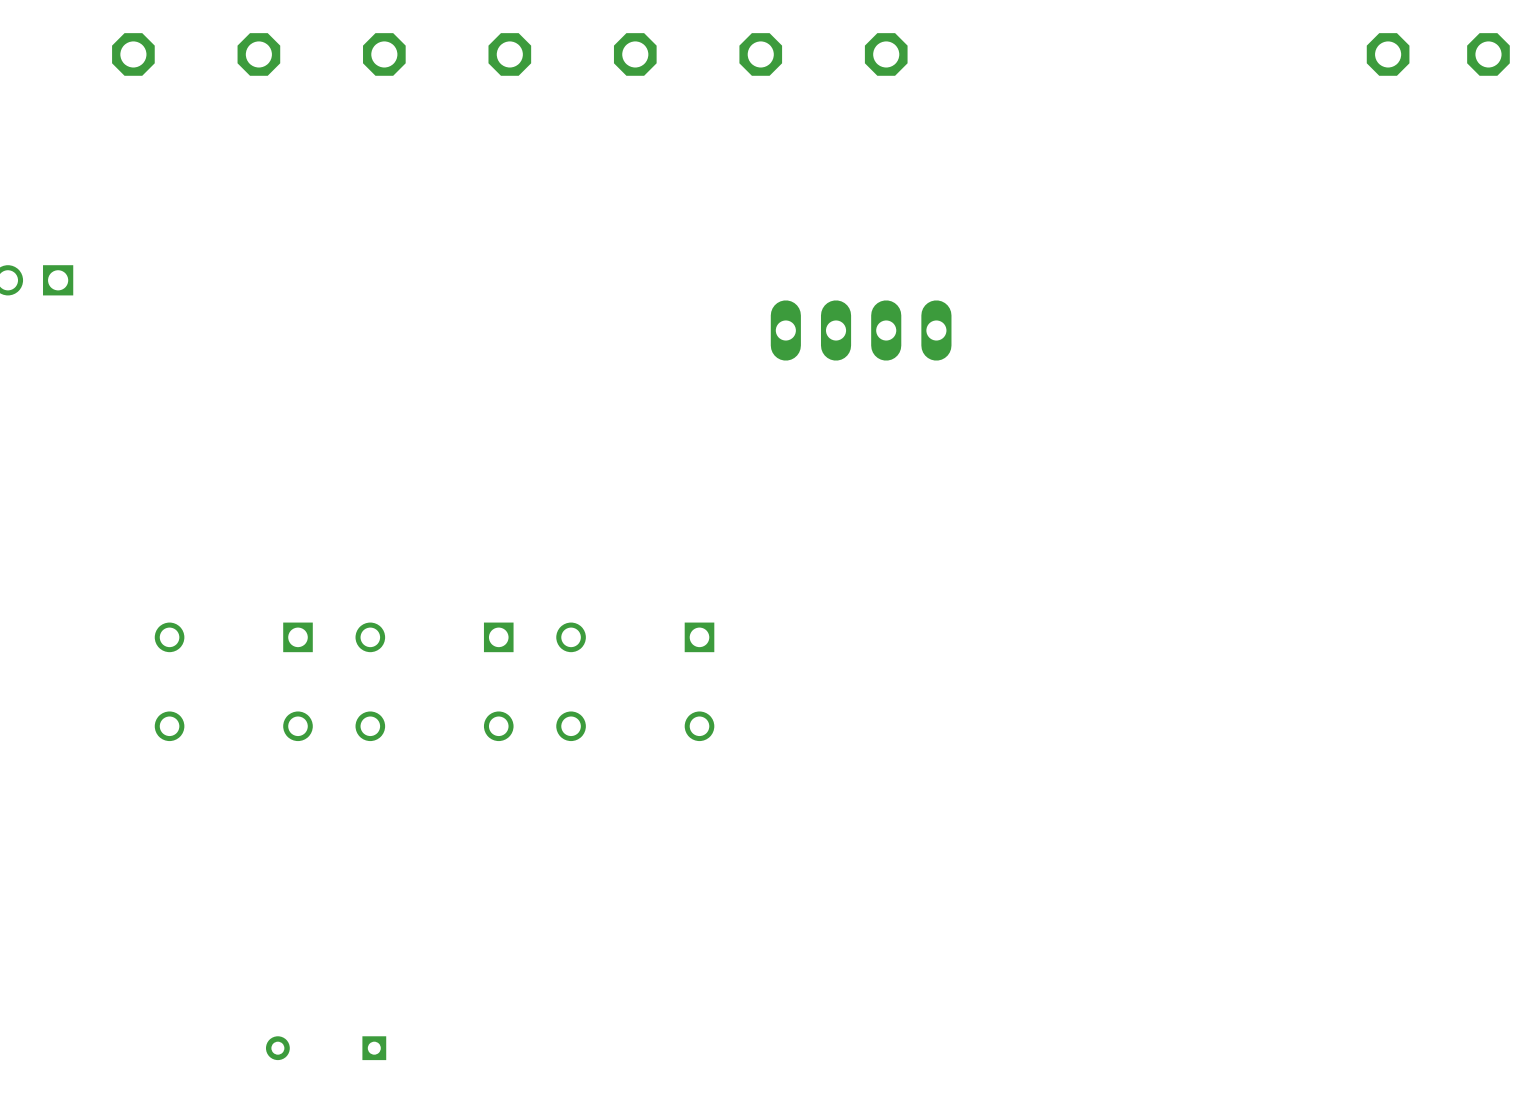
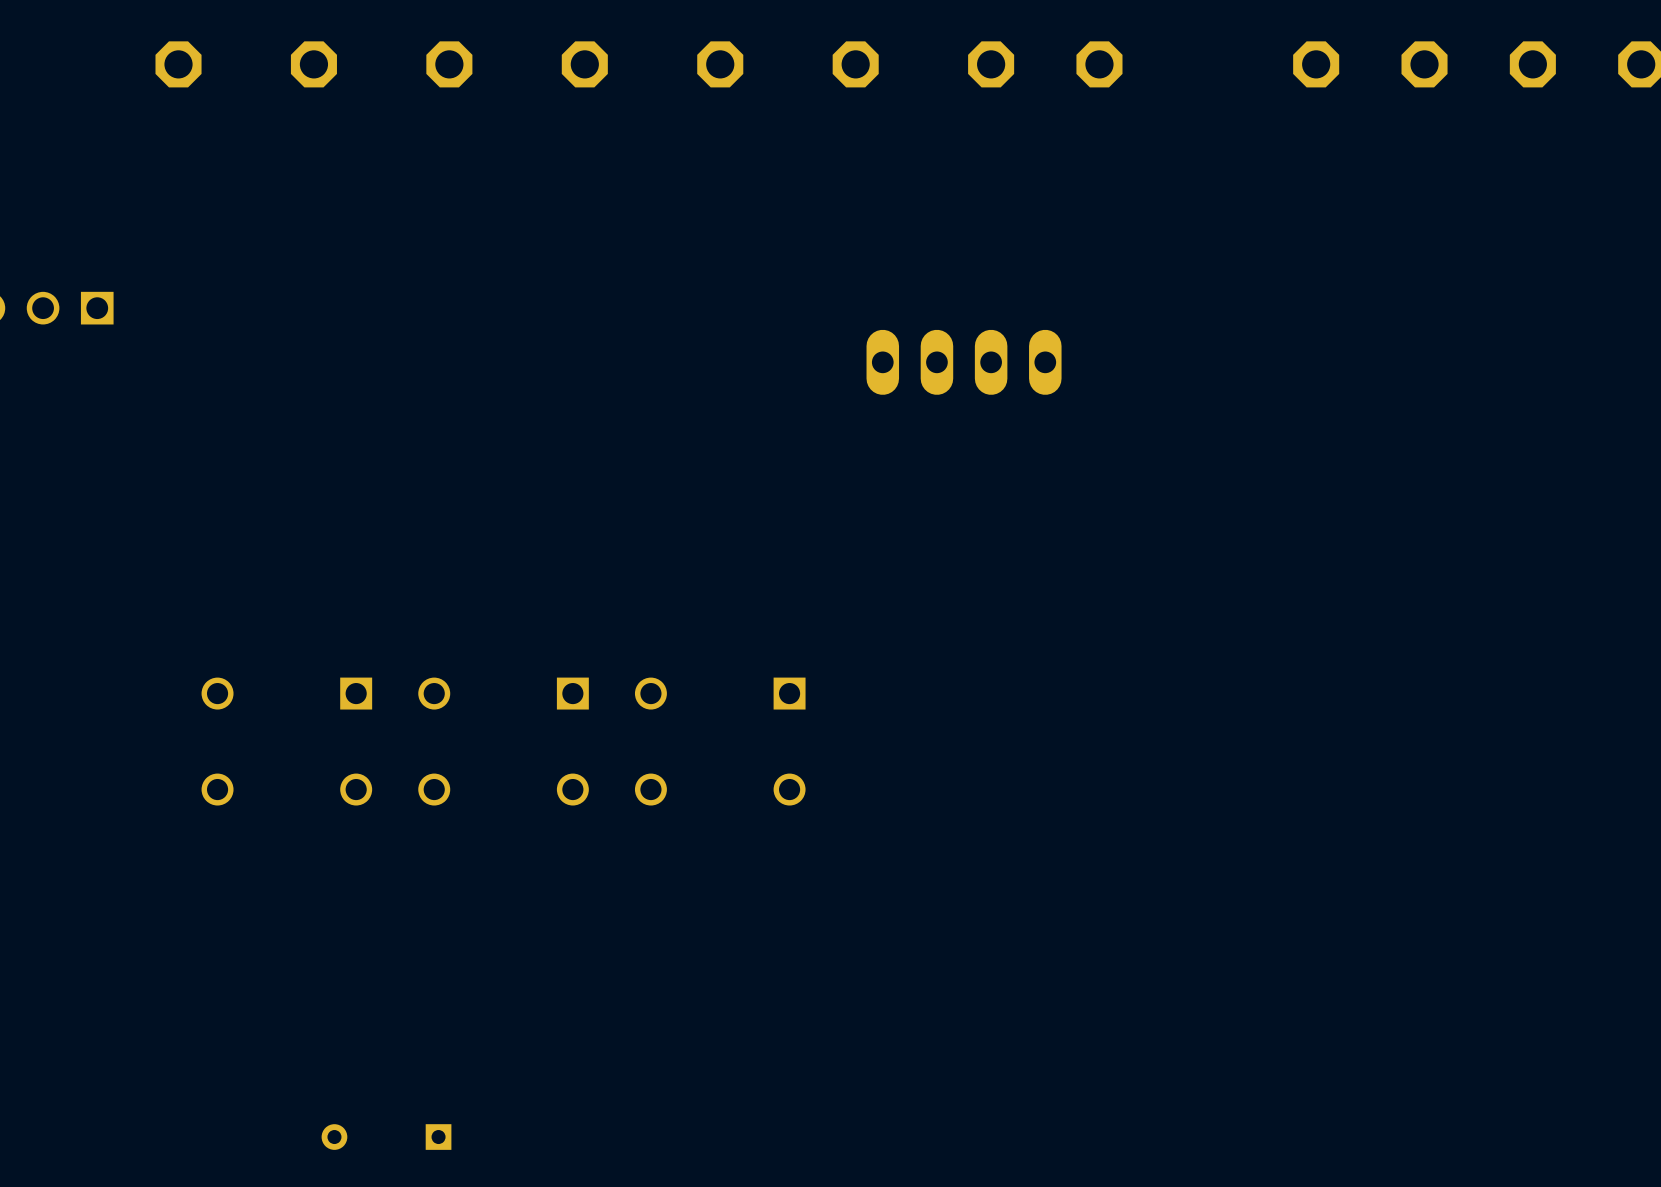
part: none -> (1099, 64)
part: none -> (1316, 64)
part: none -> (1424, 64)

